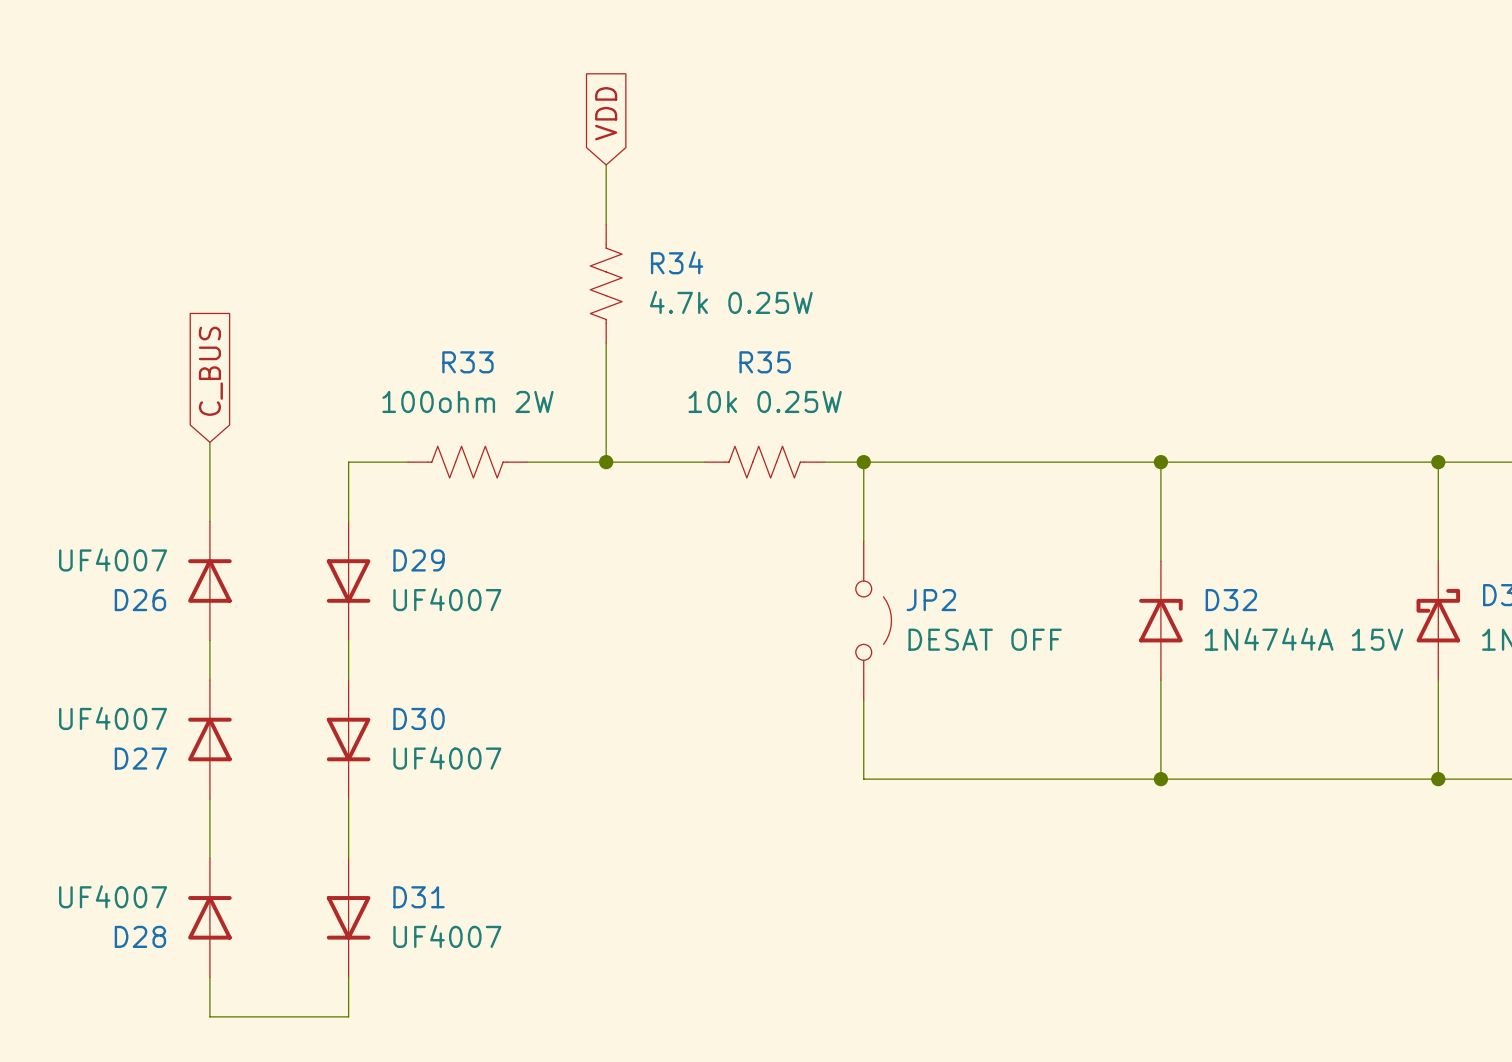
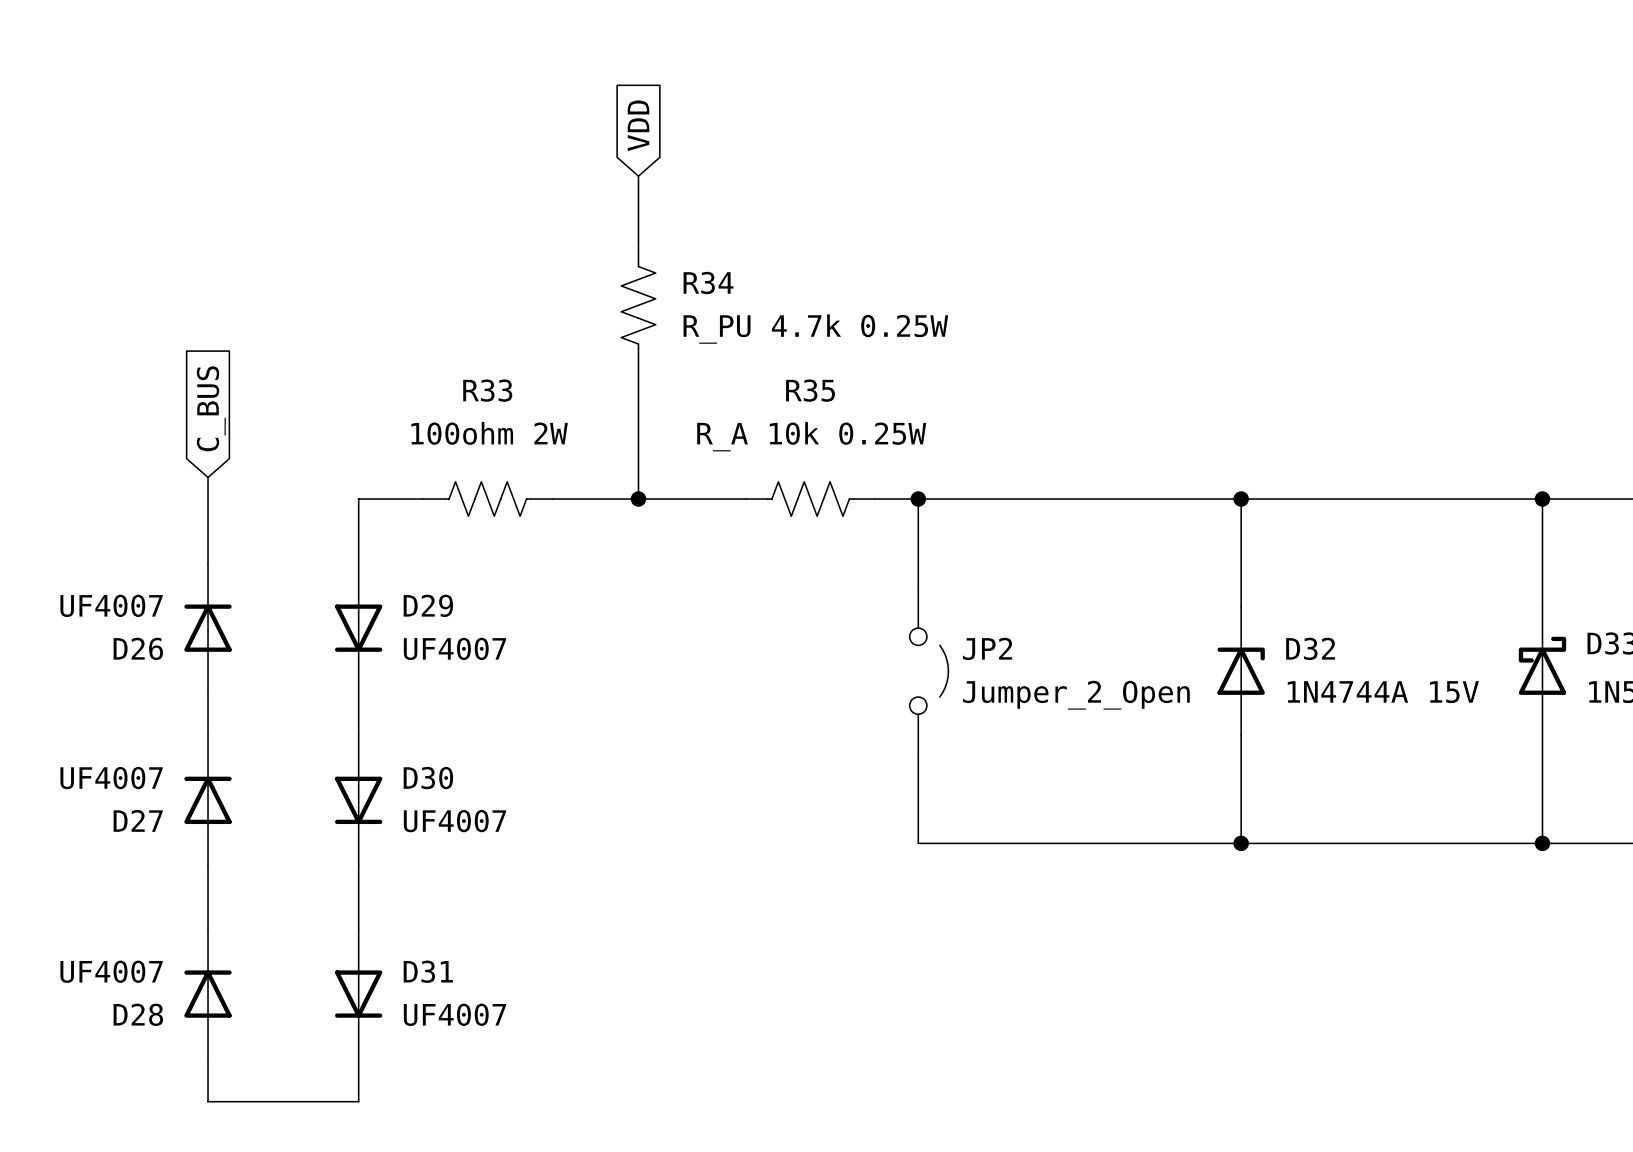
R34 value: 4.7k 0.25W (731, 302) -> R_PU 4.7k 0.25W (815, 329)
R35 value: 10k 0.25W (765, 401) -> R_A 10k 0.25W (811, 436)
JP2 value: DESAT OFF (985, 639) -> Jumper_2_Open (1076, 695)

